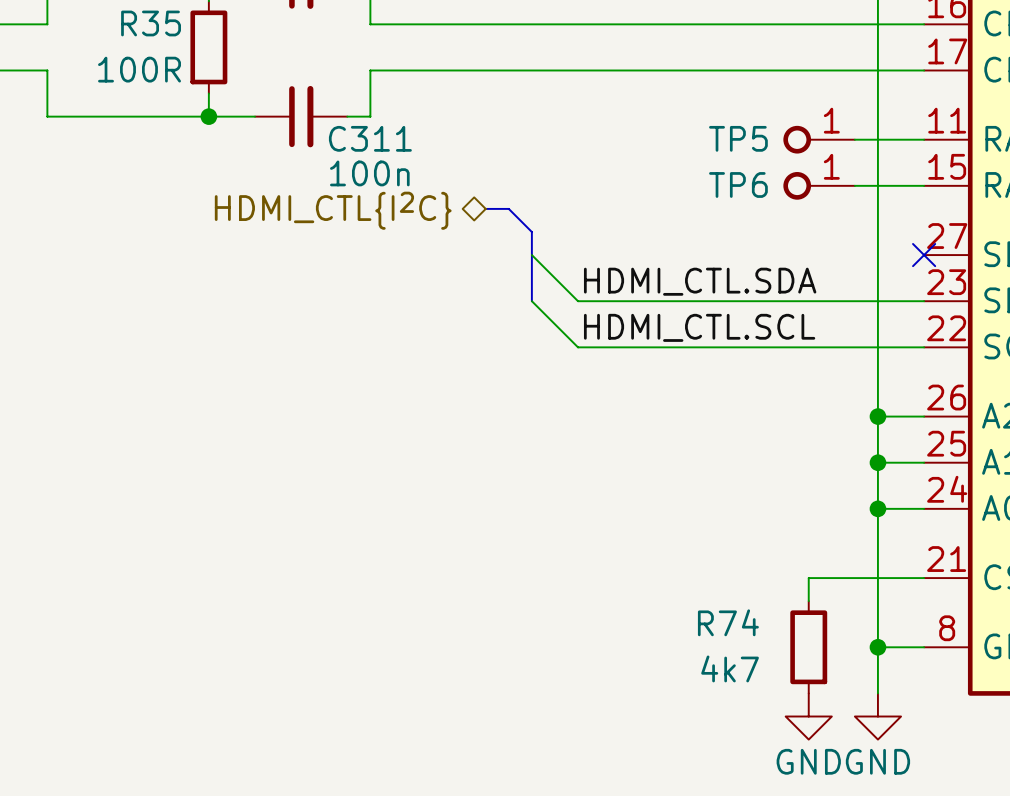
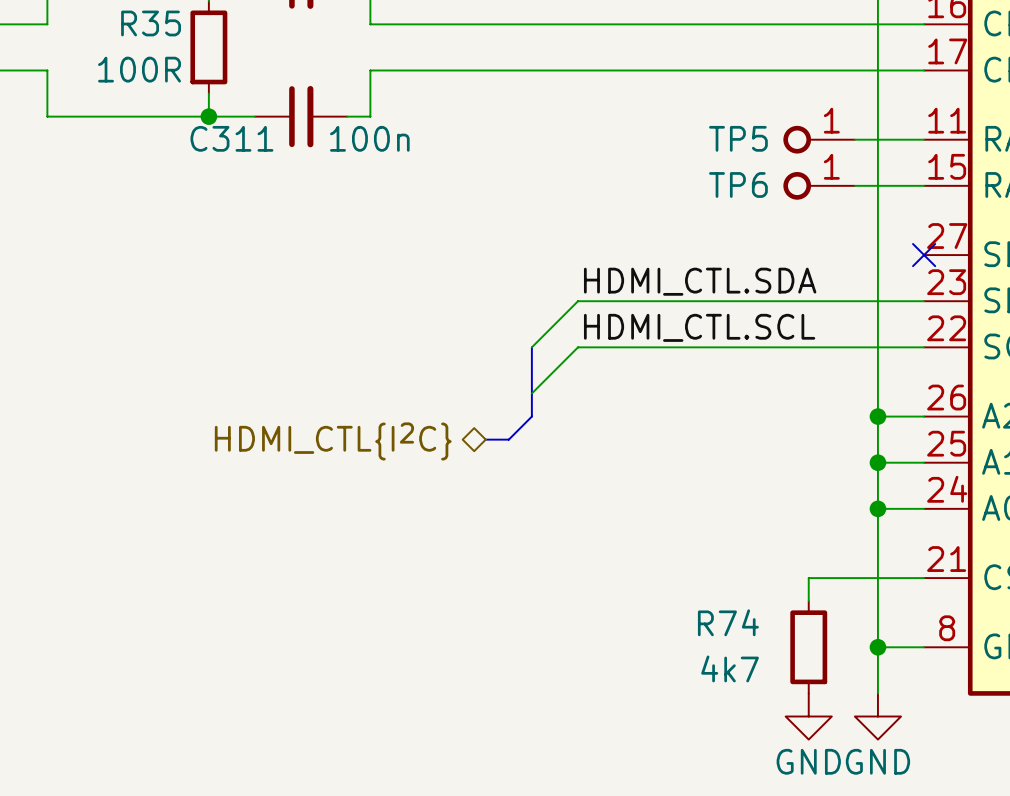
C311 name position: C311 (370, 138) -> C311 (231, 138)
C311 text position: 100n (369, 173) -> 100n (369, 138)
bus: (485, 208) (508, 208) (531, 231) (531, 301) -> none
hierarchical label position: HDMI_CTL{I2C} (333, 210) -> HDMI_CTL{I2C} (333, 441)
wire: (531, 255) (578, 301) -> (531, 347) (578, 301)
wire: (531, 301) (578, 347) -> (531, 393) (578, 347)
bus: none -> (531, 347) (531, 416) (508, 439) (485, 439)

